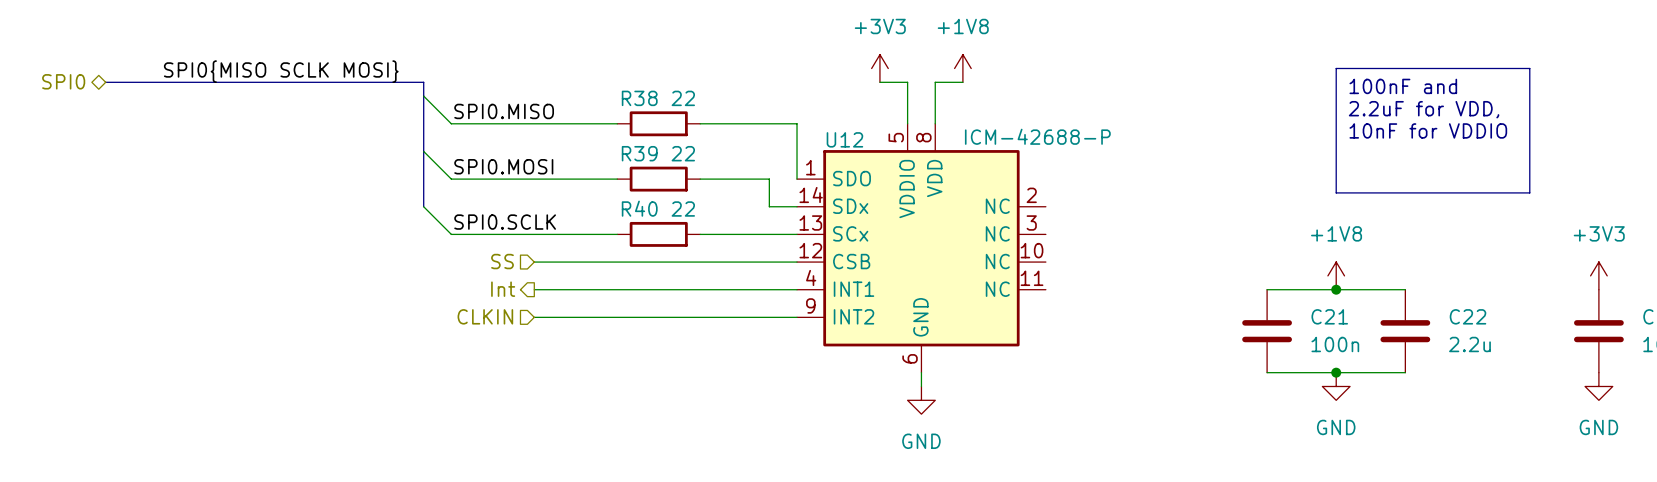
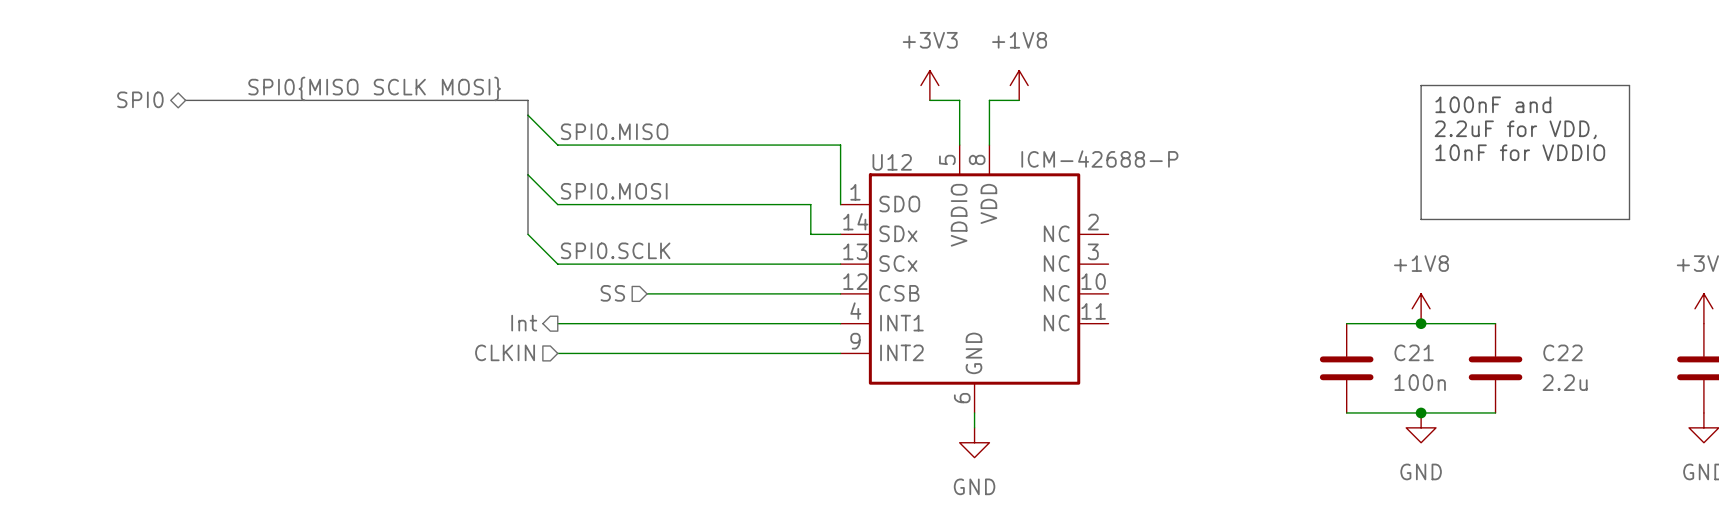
label position: SPI0{MISO SCLK MOSI} (281, 71) -> SPI0{MISO SCLK MOSI} (374, 88)
hierarchical label position: SPI0 (63, 81) -> SPI0 (140, 99)
bus: (105, 82) (188, 82) -> none
bus: (423, 82) (423, 206) -> (438, 100) (527, 100) (527, 234)
wire: (423, 96) (451, 123) (534, 123) -> (527, 115) (557, 145)
label position: SPI0.MISO (504, 111) -> SPI0.MISO (614, 131)
wire: none -> (647, 145) (736, 145)
R38: 22 (658, 123) -> none
wire: (423, 151) (451, 179) (534, 179) -> (527, 174) (557, 204)
label position: SPI0.MOSI (503, 166) -> SPI0.MOSI (614, 191)
wire: none -> (647, 204) (736, 204)
R39: 22 (658, 179) -> none
wire: (423, 206) (451, 234) (534, 234) -> (527, 234) (557, 264)
label position: SPI0.SCLK (505, 222) -> SPI0.SCLK (615, 250)
R40: 22 (658, 234) -> none
hierarchical label position: SS (502, 261) -> SS (612, 293)
wire: (534, 262) (617, 262) -> (647, 264) (736, 264)

